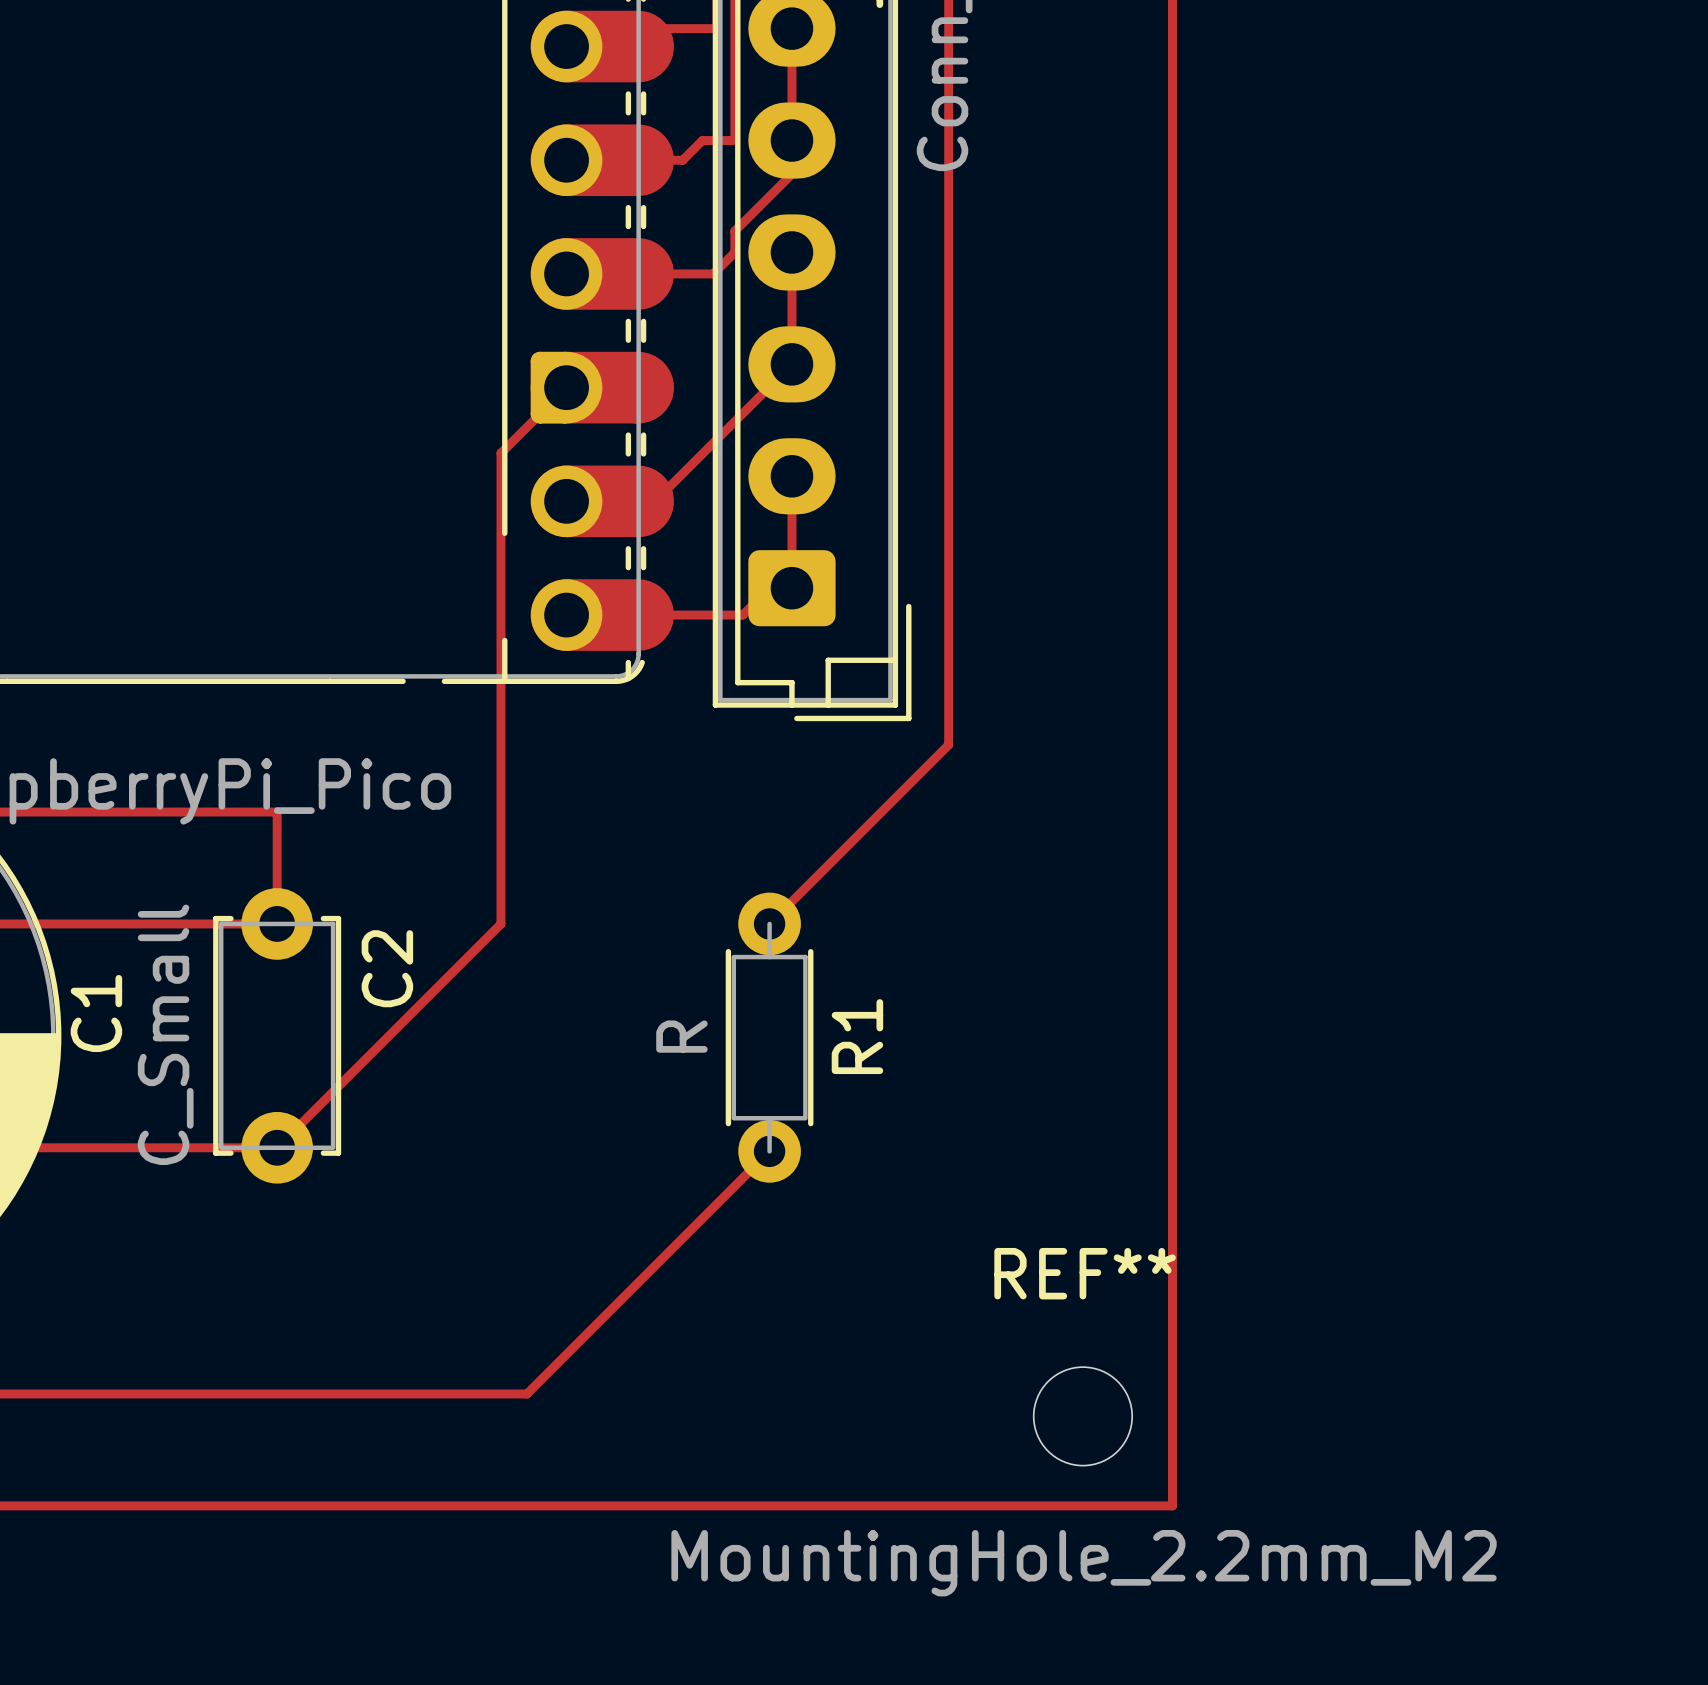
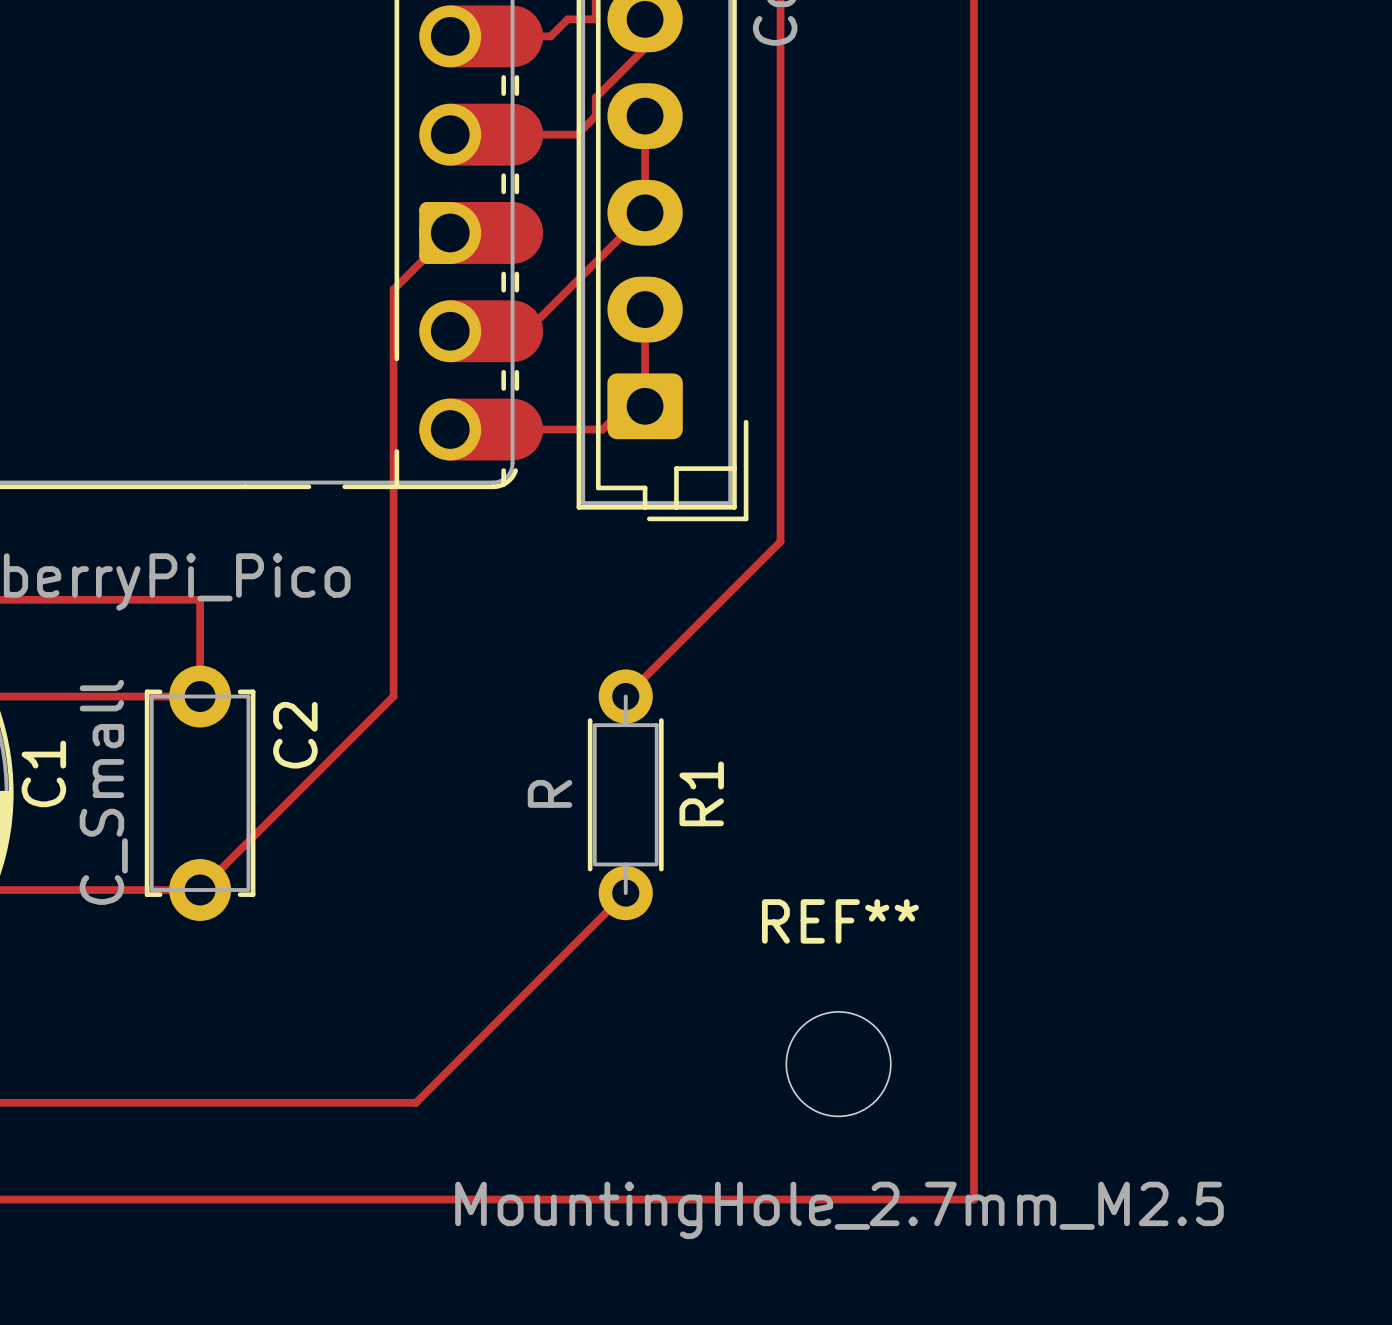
REF**: none -> MountingHole_2.7mm_M2.5 (838, 1064)
REF**: MountingHole_2.2mm_M2 (1082, 1416) -> none

